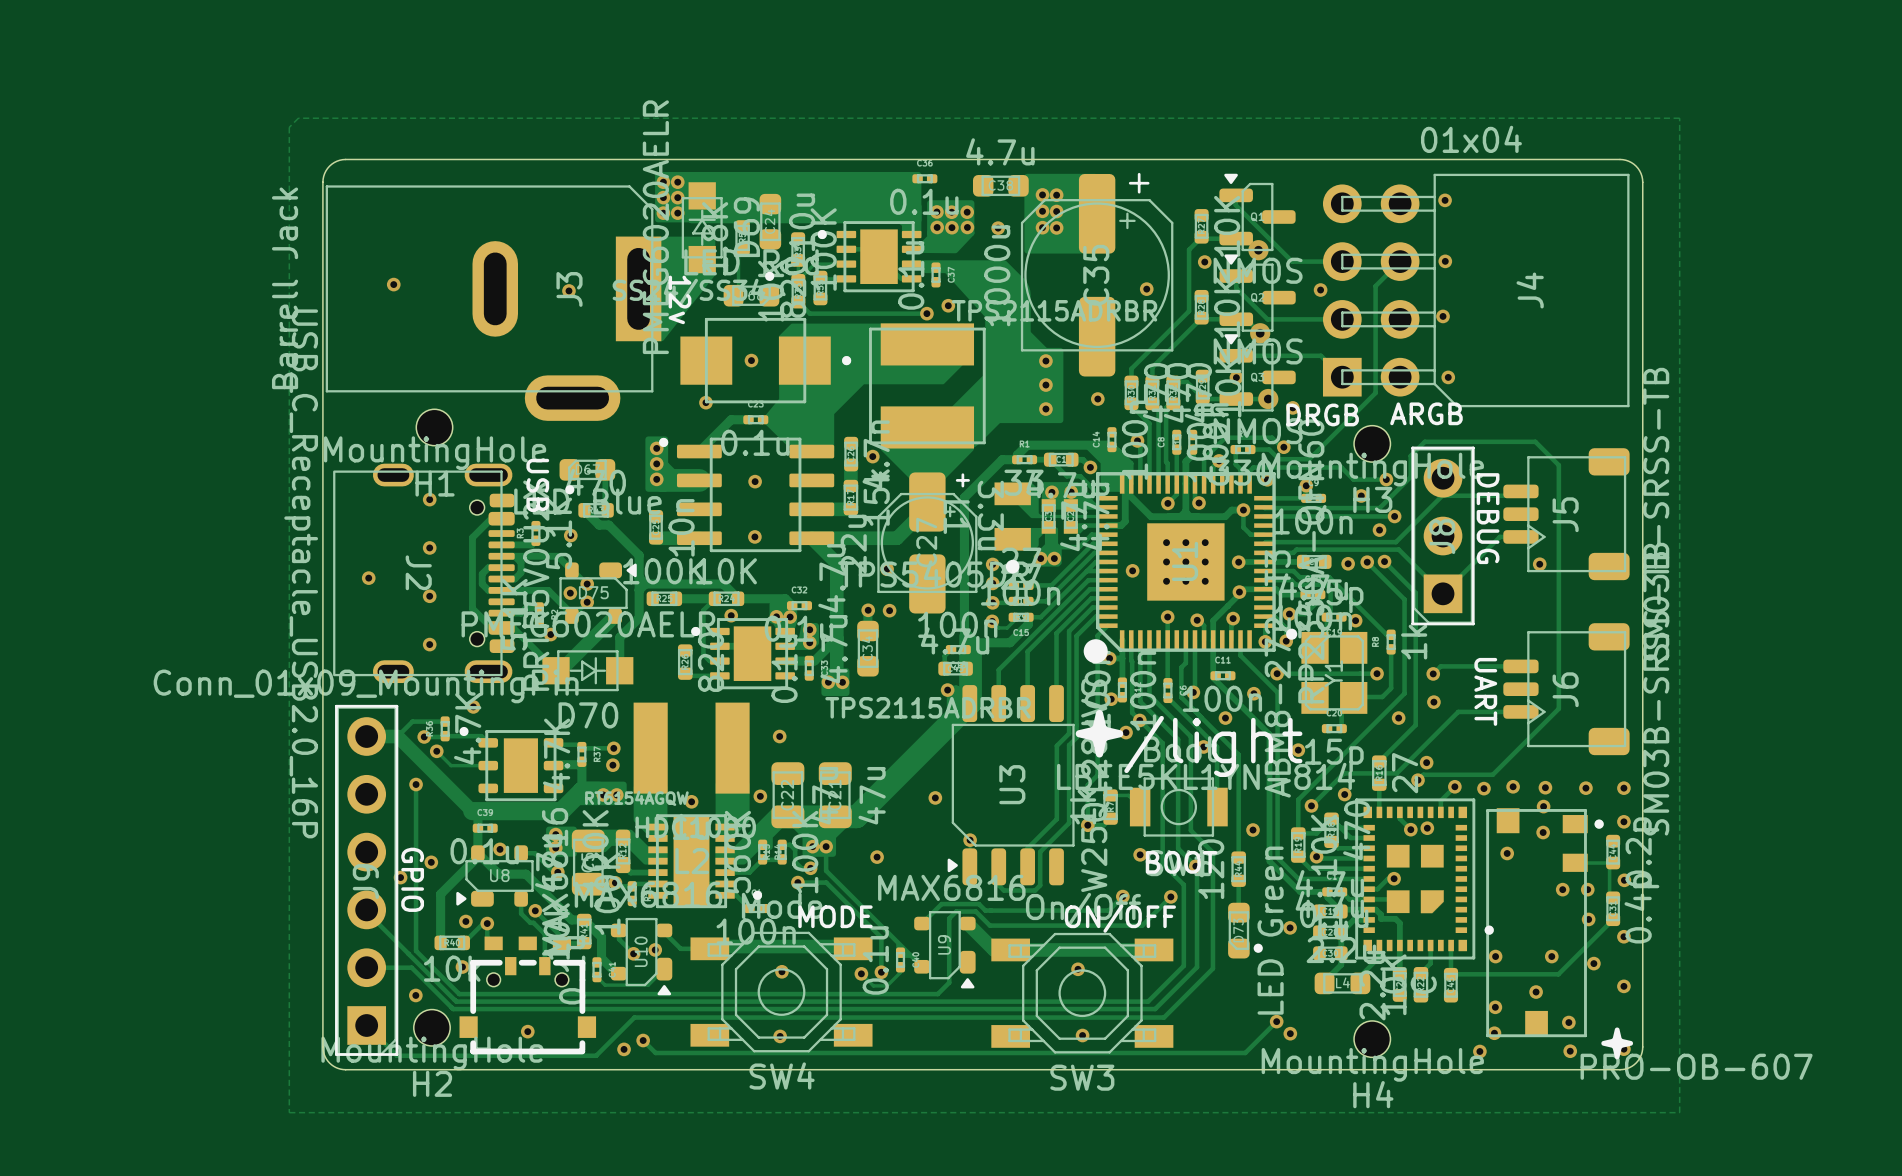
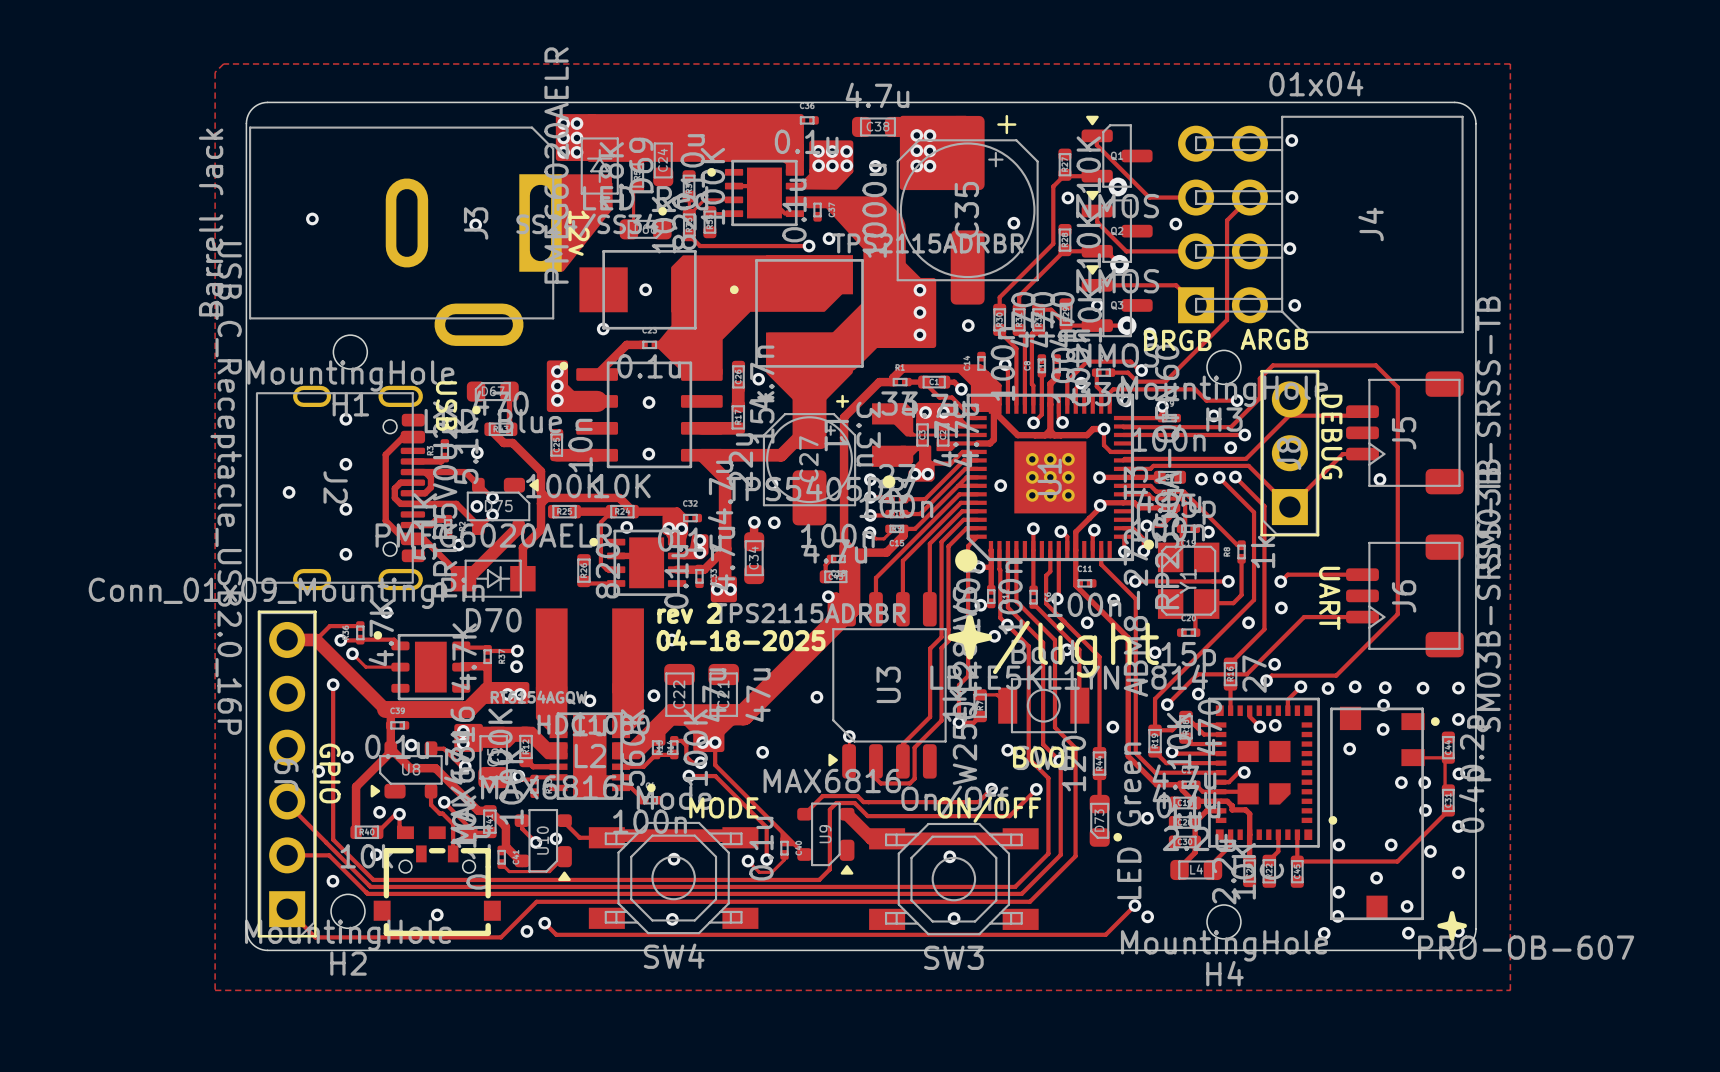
text: none -> rev 2 (689, 613)
text: none -> 04-18-2025 (741, 640)

